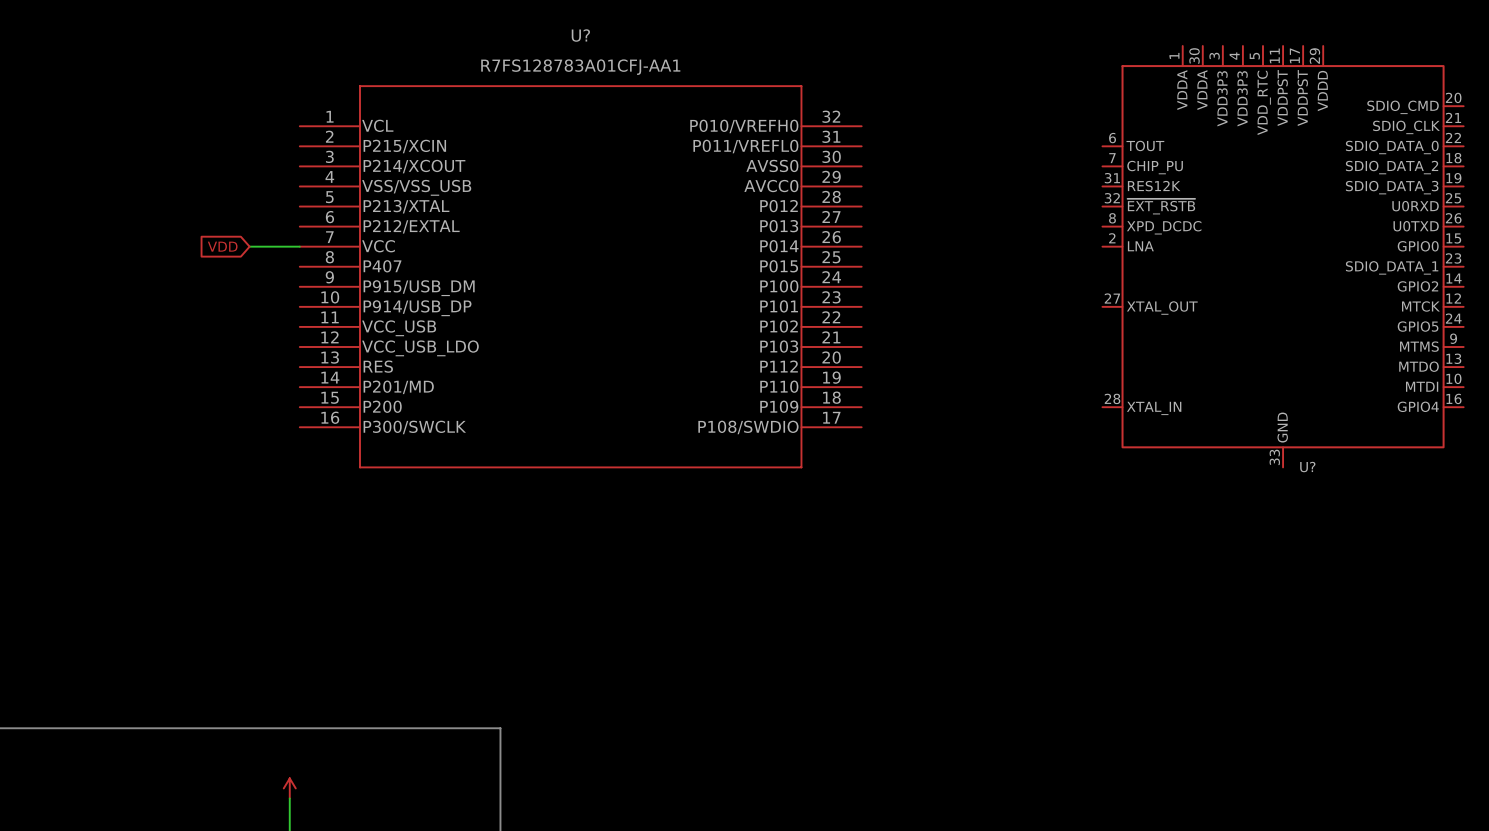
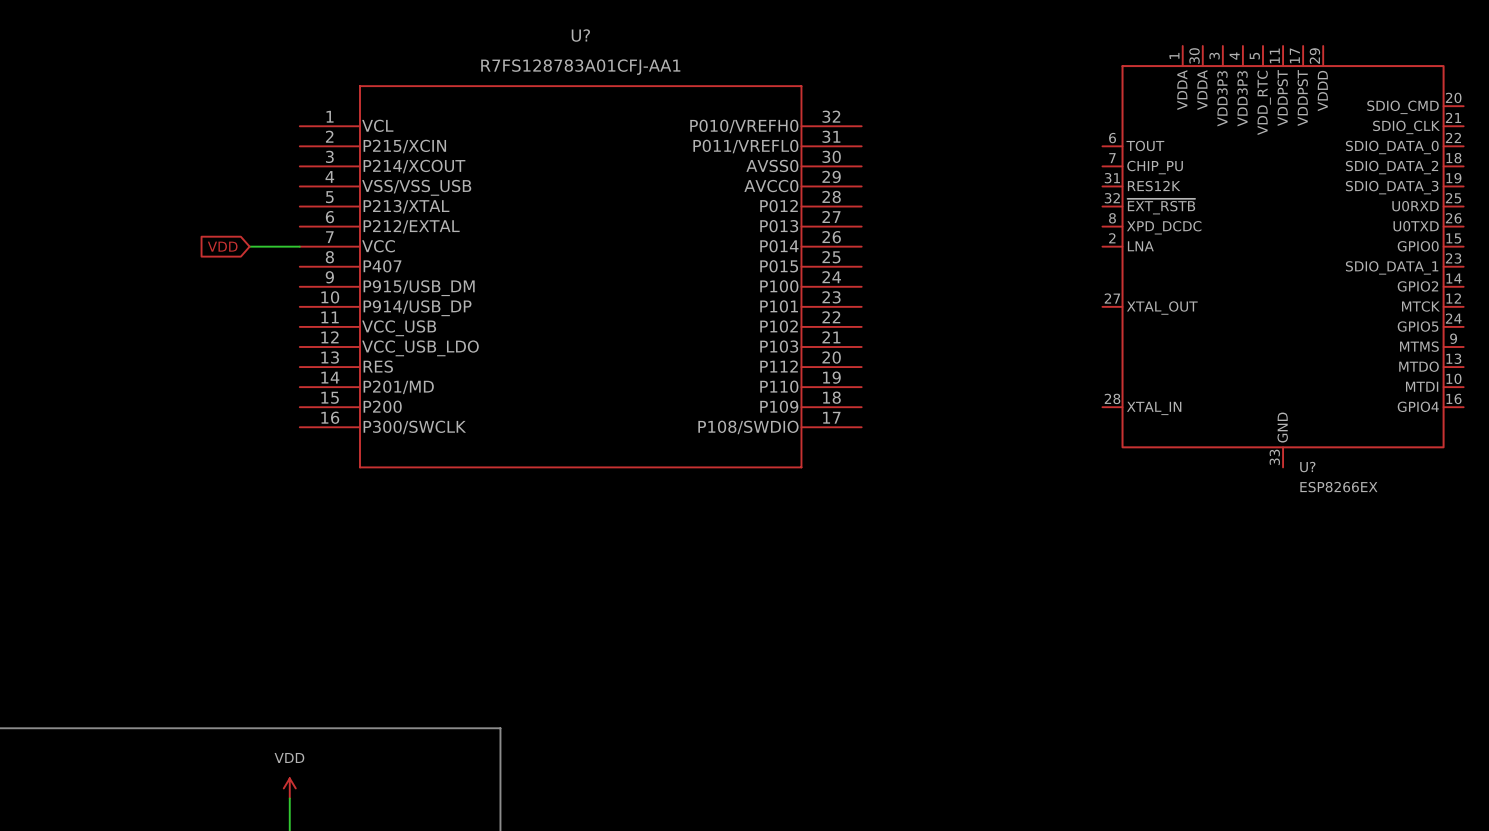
U? value: none -> ESP8266EX (1338, 487)
power symbol text: none -> VDD (289, 757)

